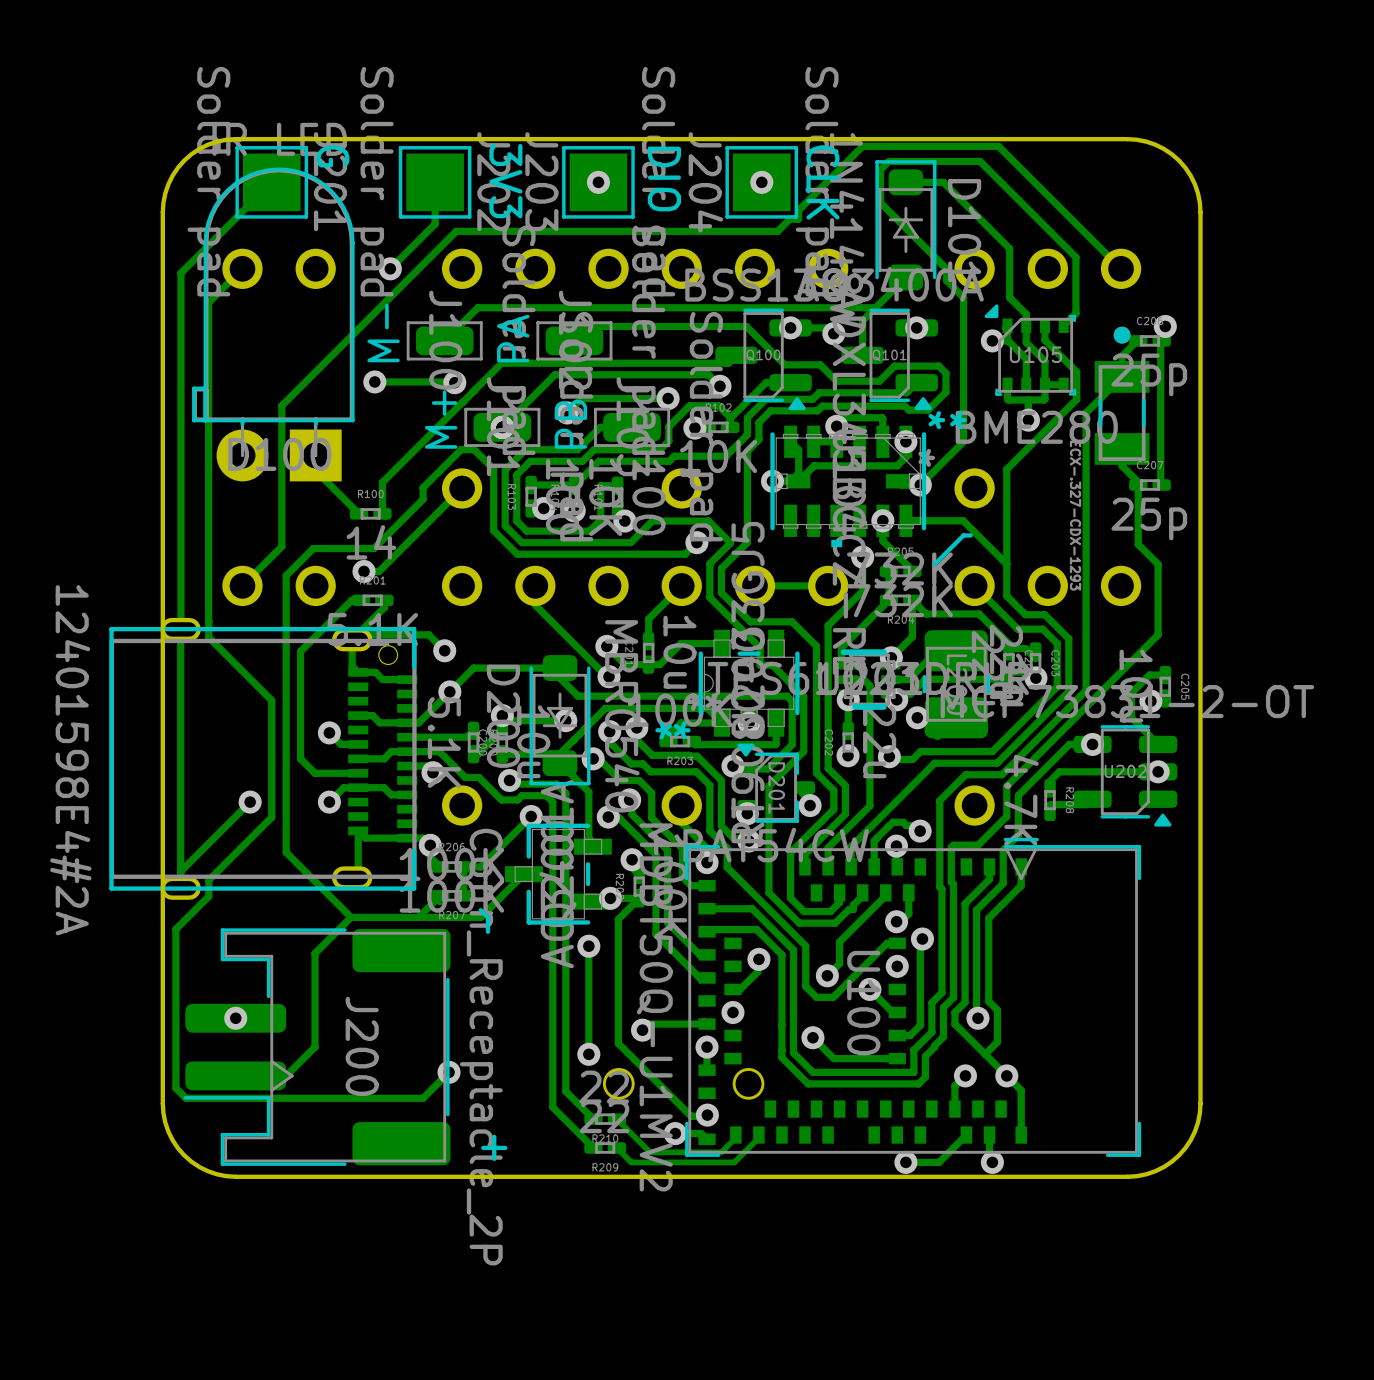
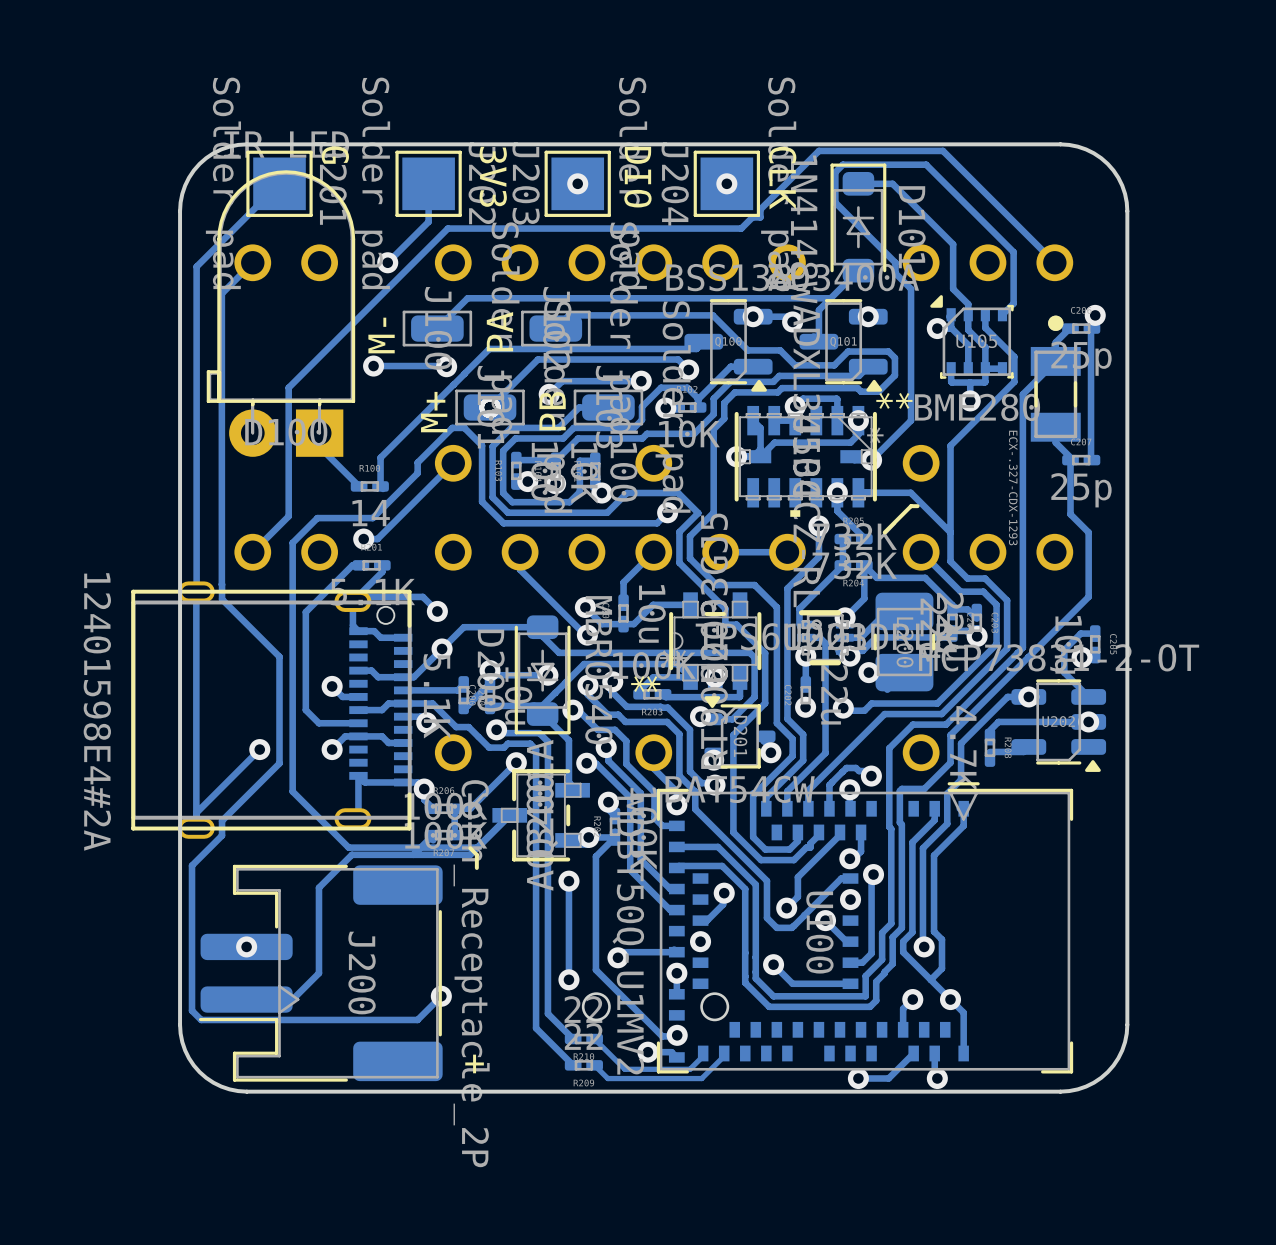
track: (286, 848) (286, 852) (351, 917) -> (292, 791) (348, 847) (477, 847)

